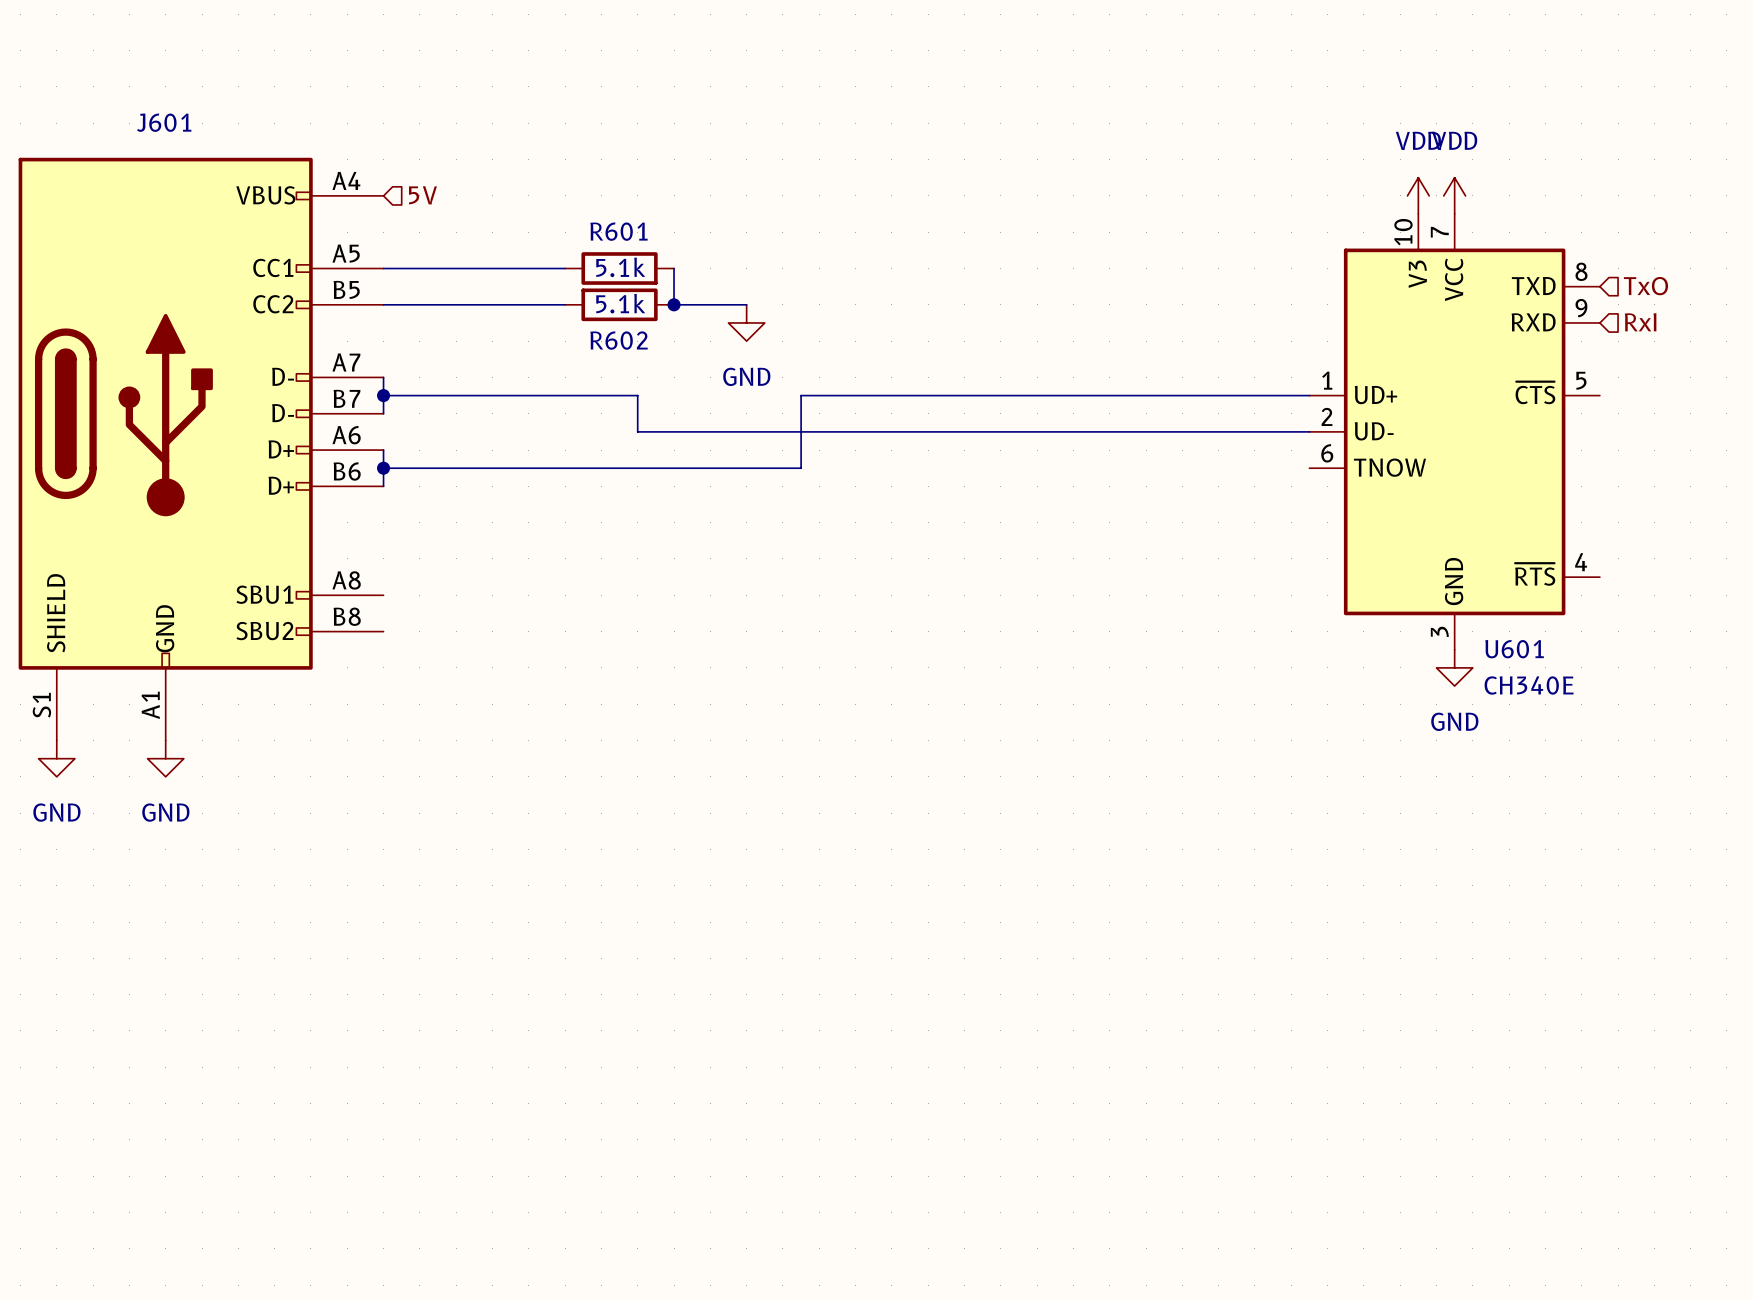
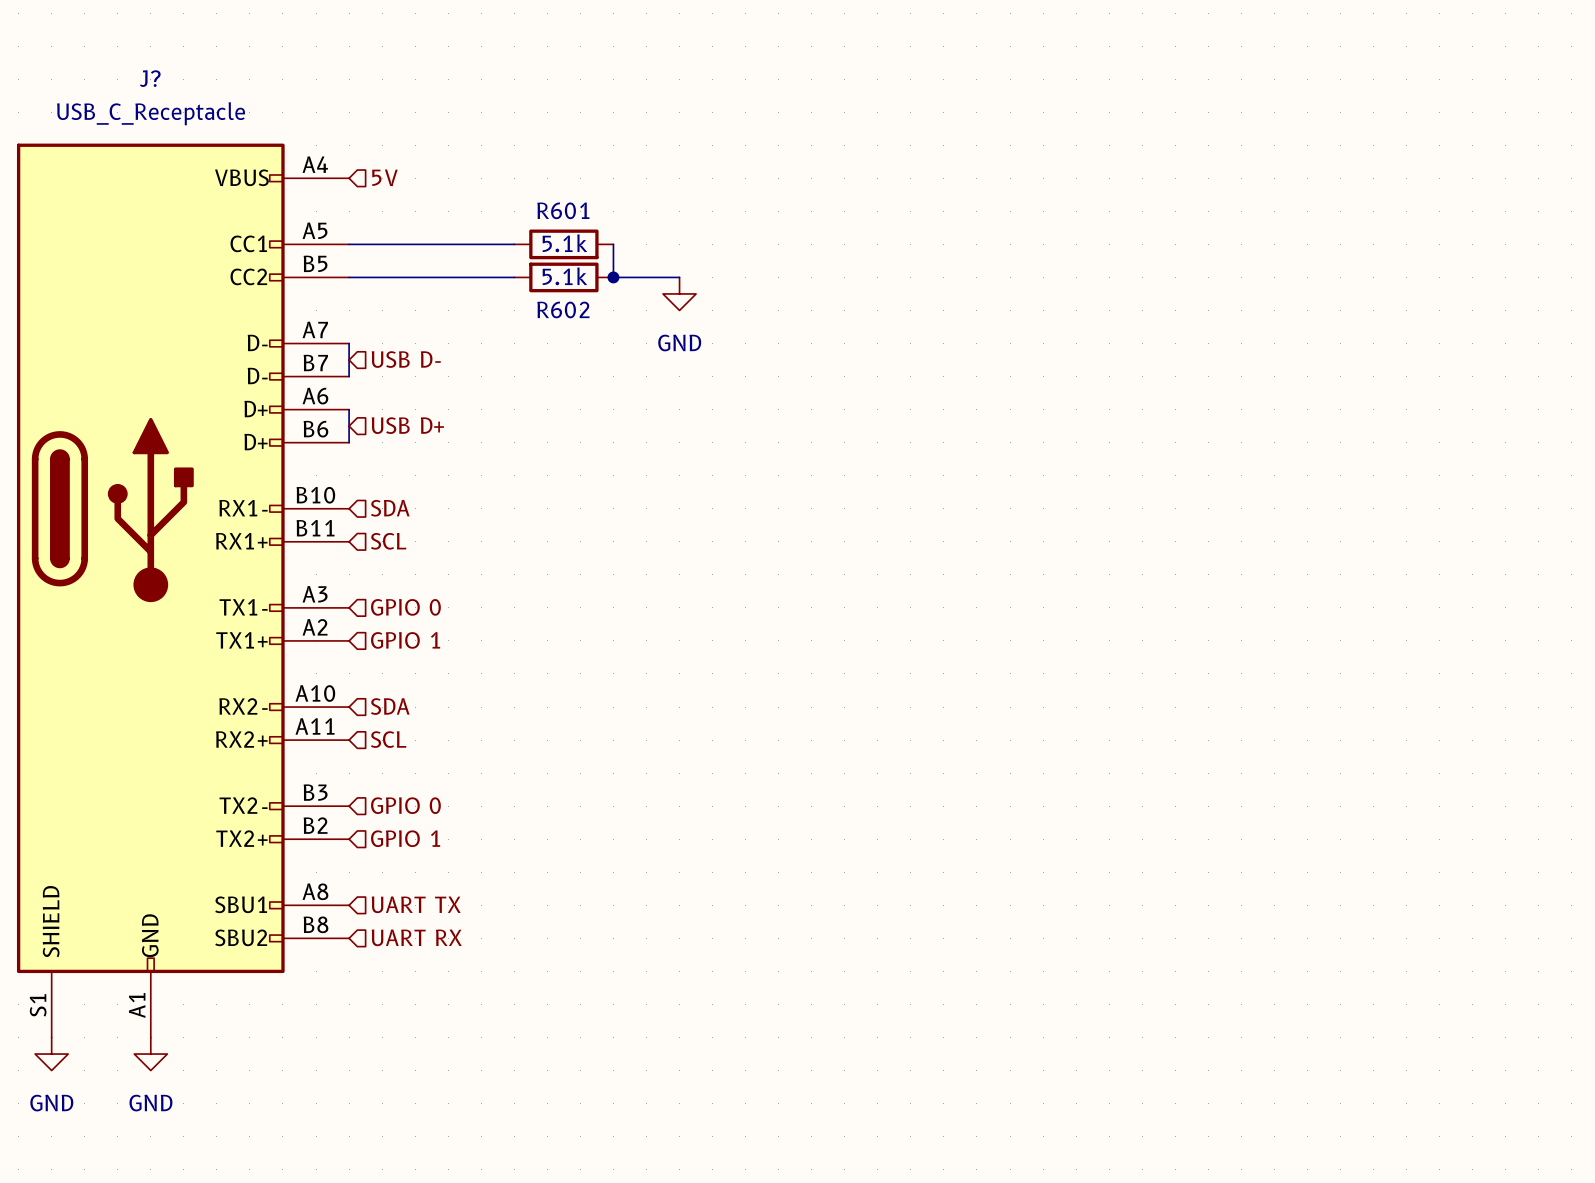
power symbol: VDD (1418, 195) -> none
power symbol: VDD (1454, 195) -> none
hierarchical label: TxO (1645, 286) -> none
hierarchical label: RxI (1640, 322) -> none
wire: (383, 395) (637, 395) (637, 431) (1309, 431) -> none
junction: (383, 395) -> none
hierarchical label: none -> USB D- (406, 359)
wire: (1309, 395) (801, 395) (801, 468) (383, 468) -> none
U601: CH340E (1454, 431) -> none
J601: (201, 449) -> none
hierarchical label: none -> USB D+ (407, 425)
junction: (383, 468) -> none
hierarchical label: none -> SDA (390, 508)
hierarchical label: none -> SCL (388, 541)
J?: none -> USB_C_Receptacle (183, 590)
hierarchical label: none -> GPIO 0 (405, 607)
power symbol: GND (1454, 667) -> none
hierarchical label: none -> GPIO 1 (405, 640)
power symbol: GND (56, 758) -> none
power symbol: GND (165, 758) -> none
hierarchical label: none -> SDA (390, 706)
hierarchical label: none -> SCL (388, 739)
hierarchical label: none -> GPIO 0 (405, 805)
hierarchical label: none -> GPIO 1 (405, 838)
hierarchical label: none -> UART TX (416, 904)
hierarchical label: none -> UART RX (416, 937)
power symbol: none -> GND (51, 1054)
power symbol: none -> GND (150, 1054)

